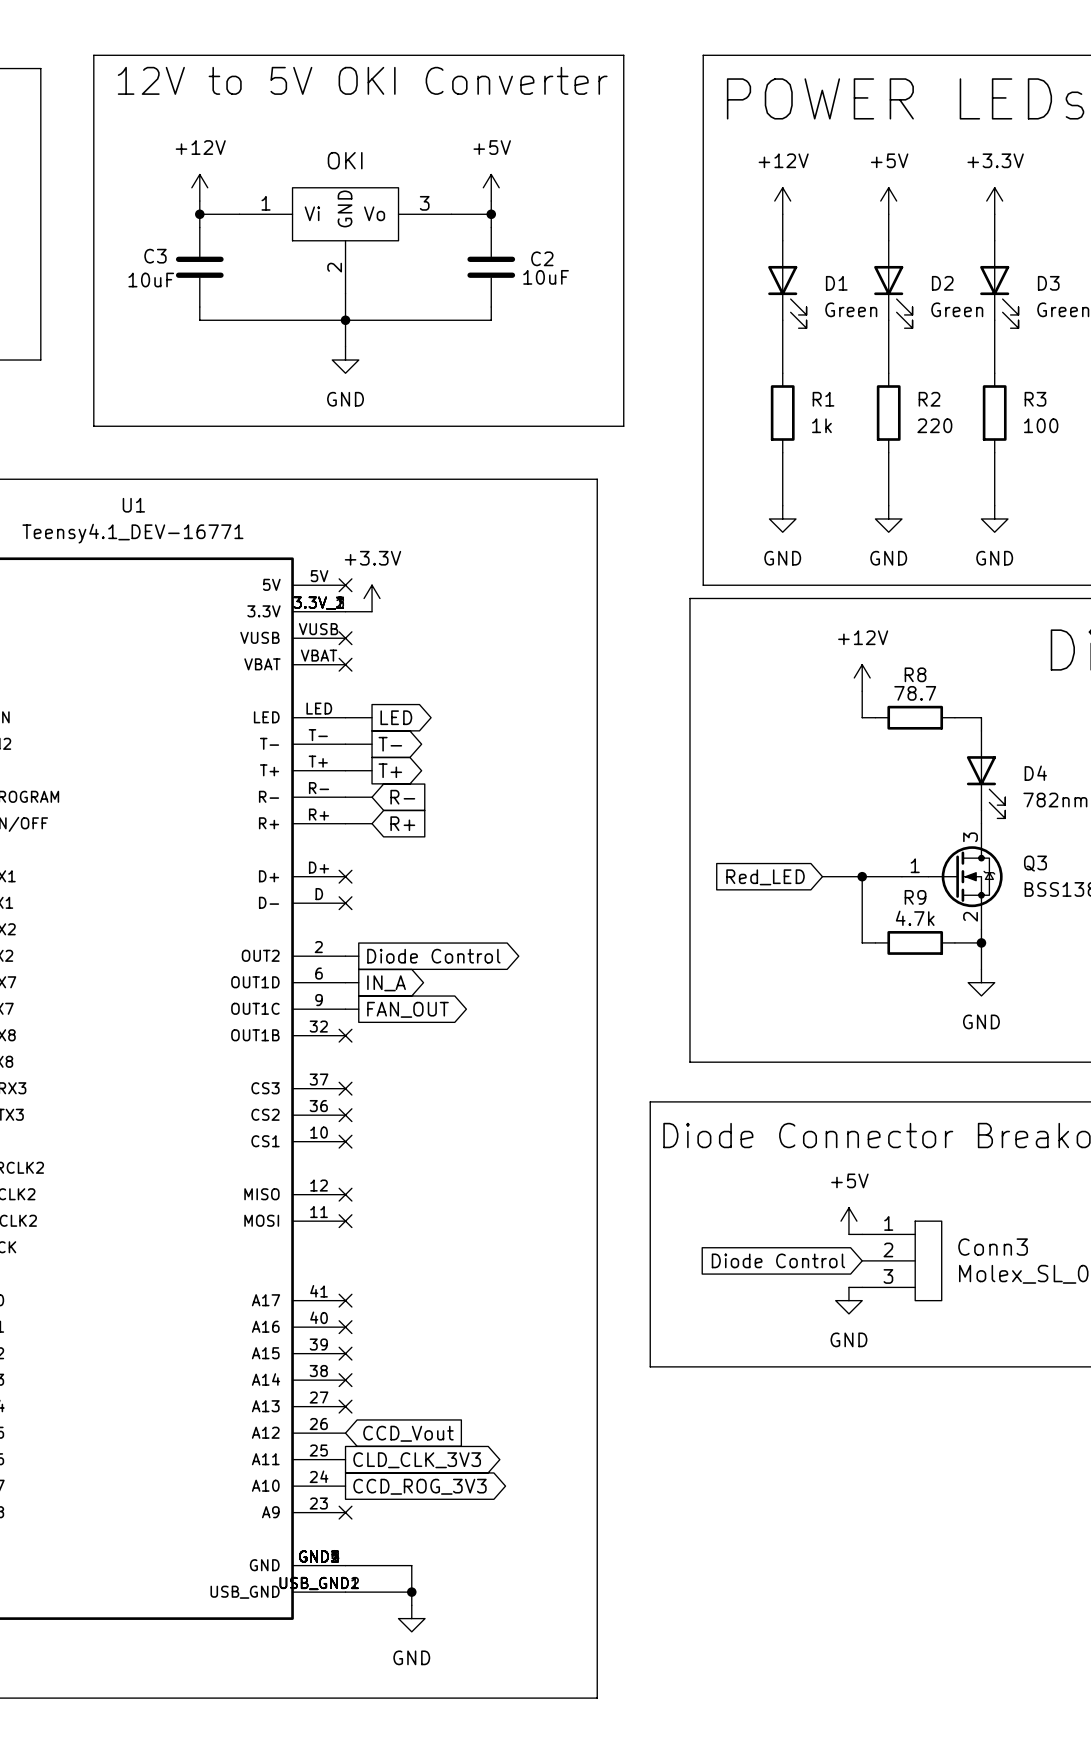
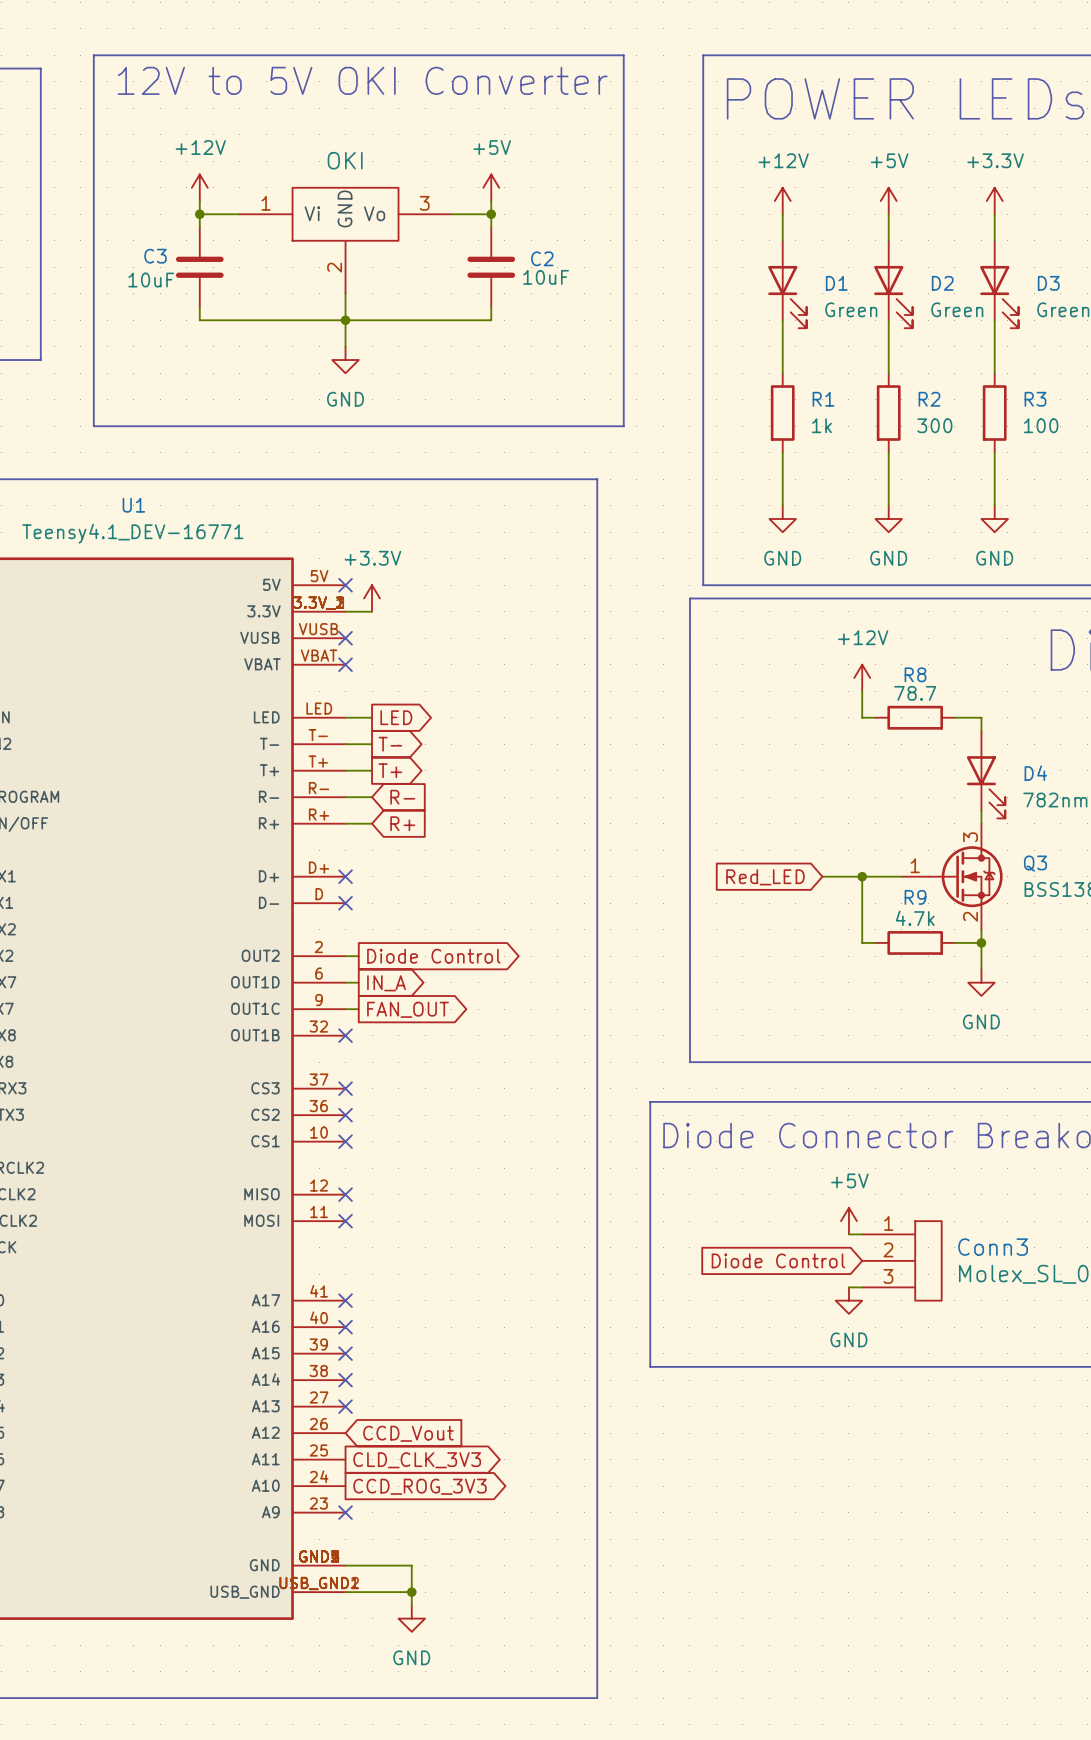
R2 value: 220 (934, 425) -> 300 (934, 425)

